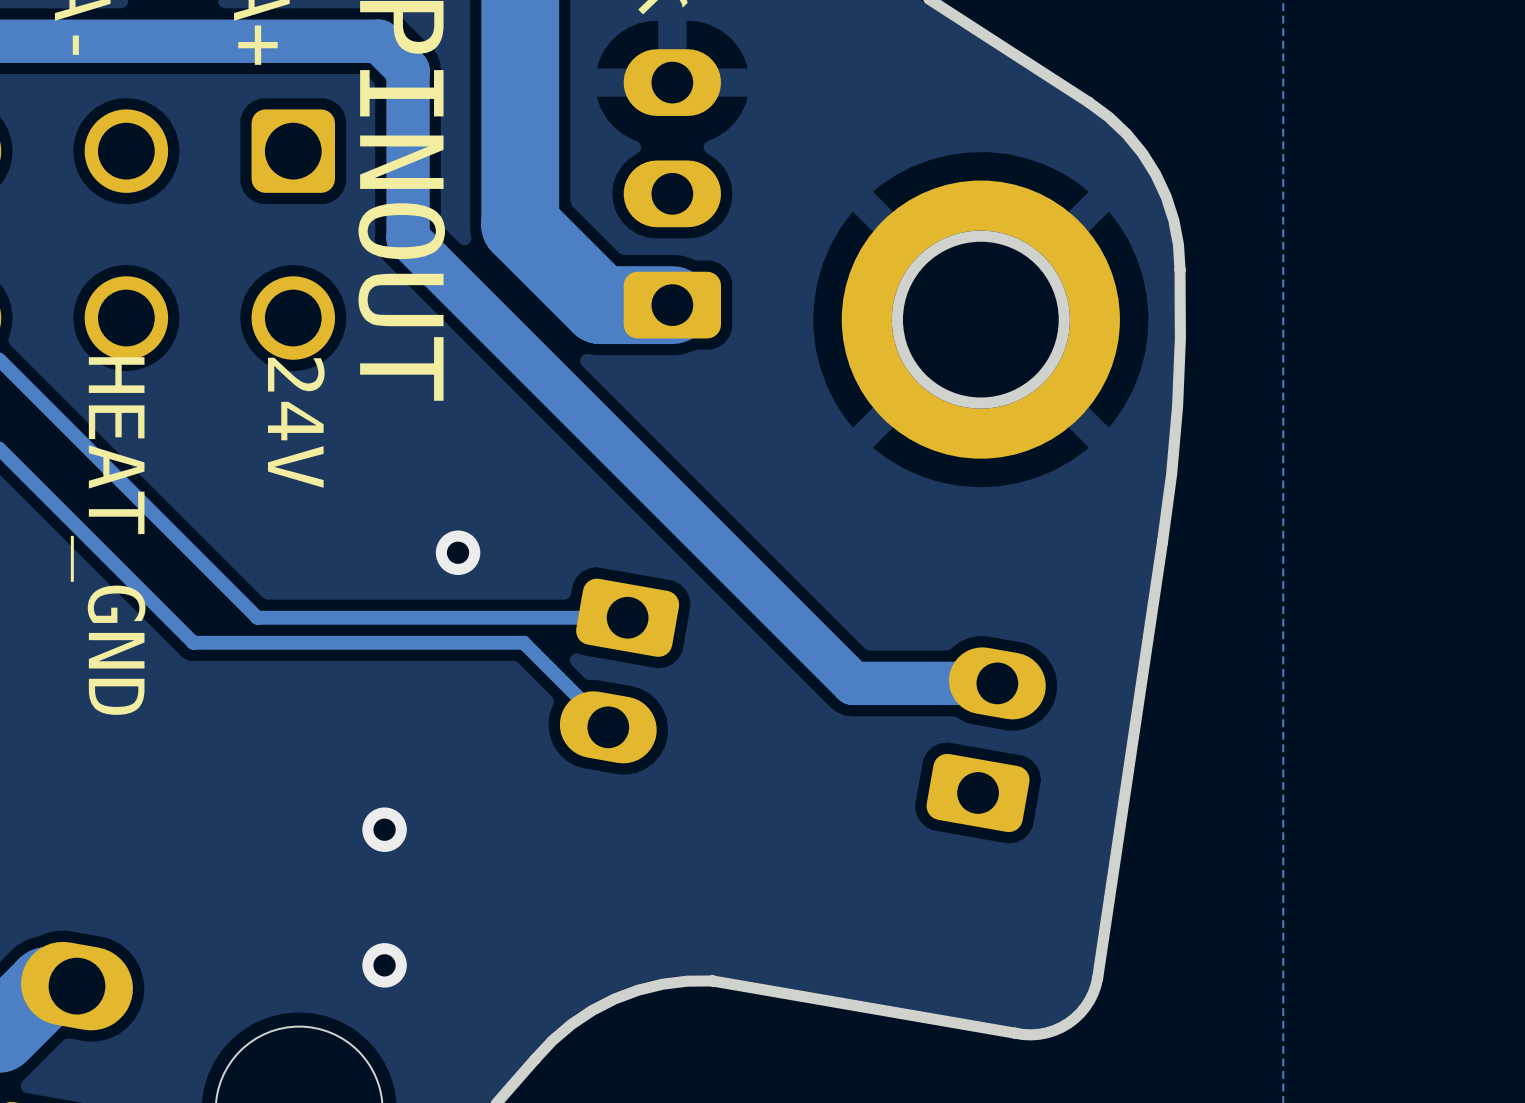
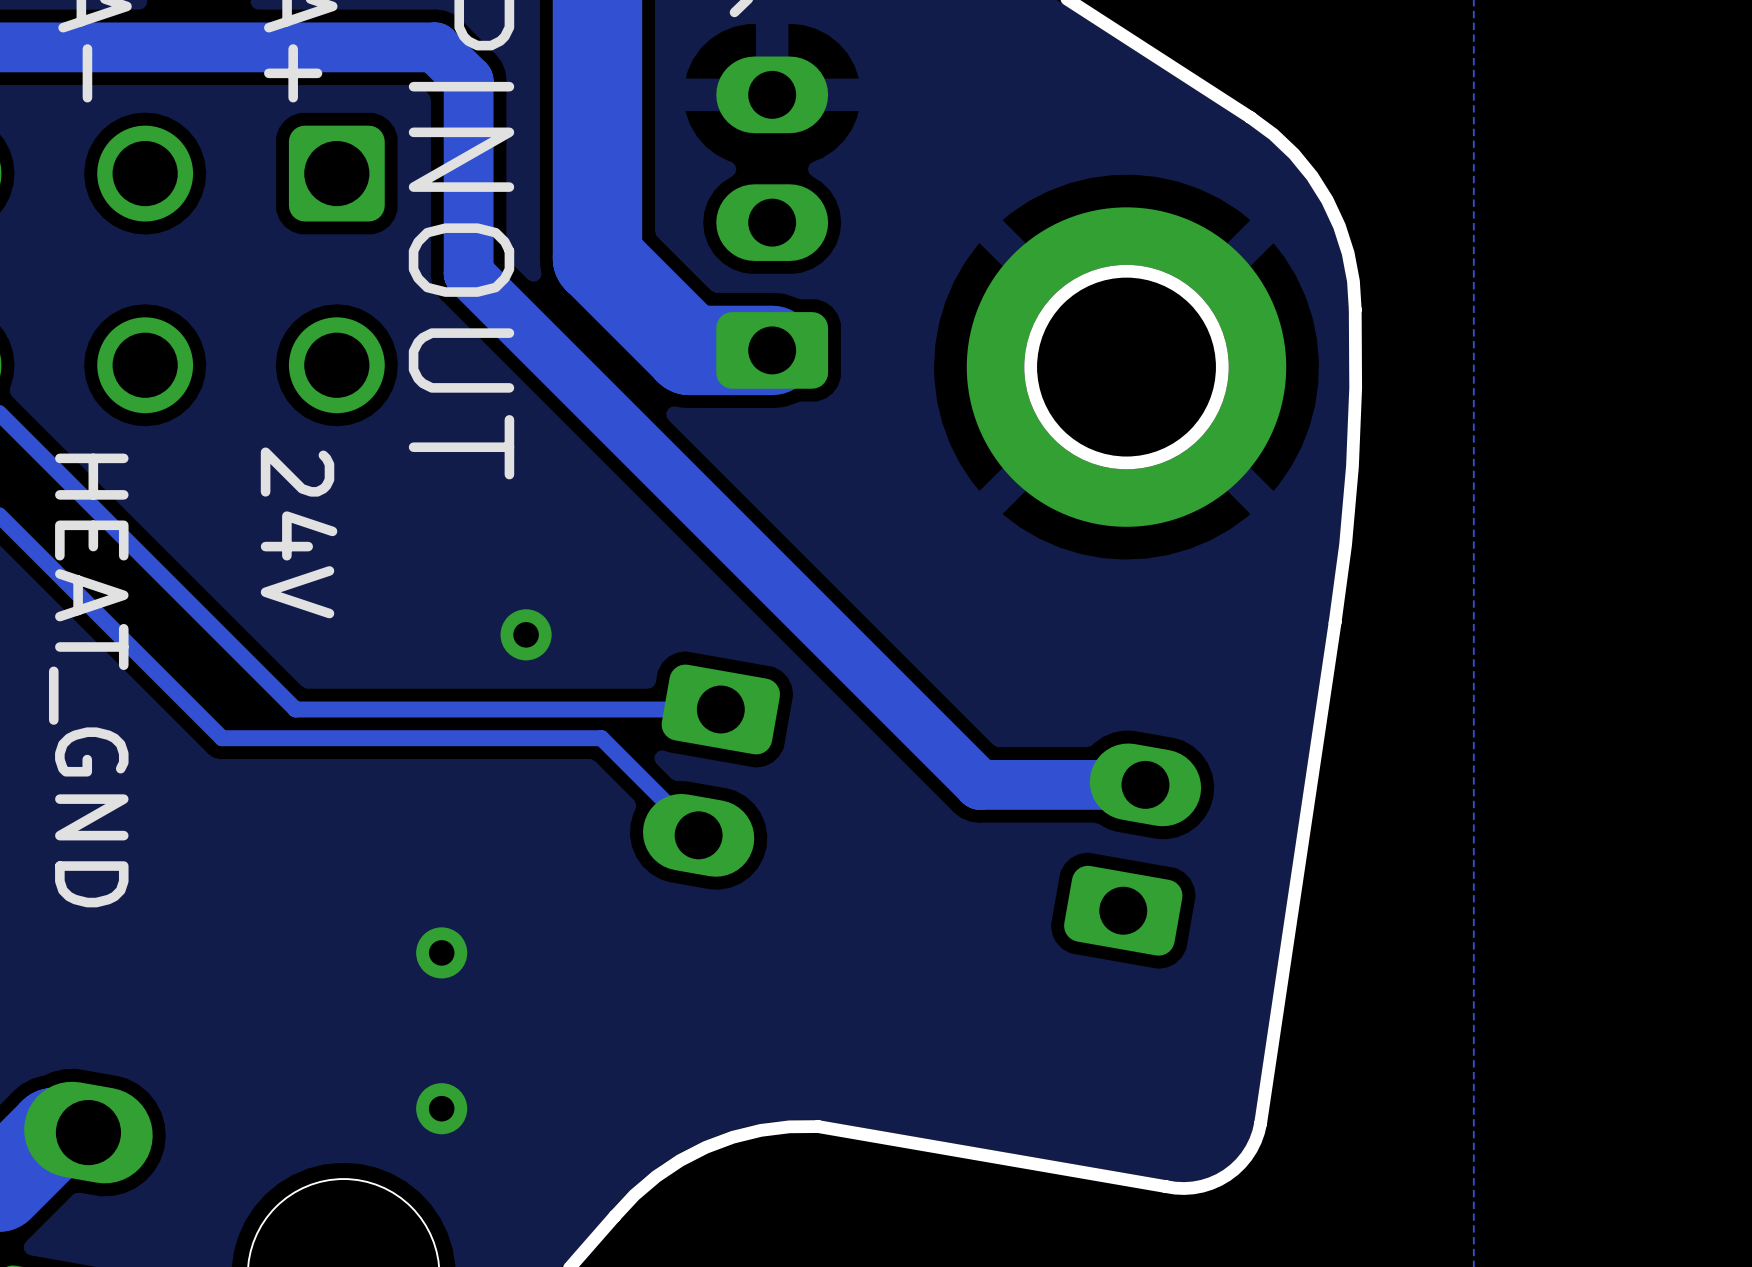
text position: 24V (296, 422) -> 24V (299, 532)
text position: HEAT_GND (108, 536) -> HEAT_GND (88, 680)

